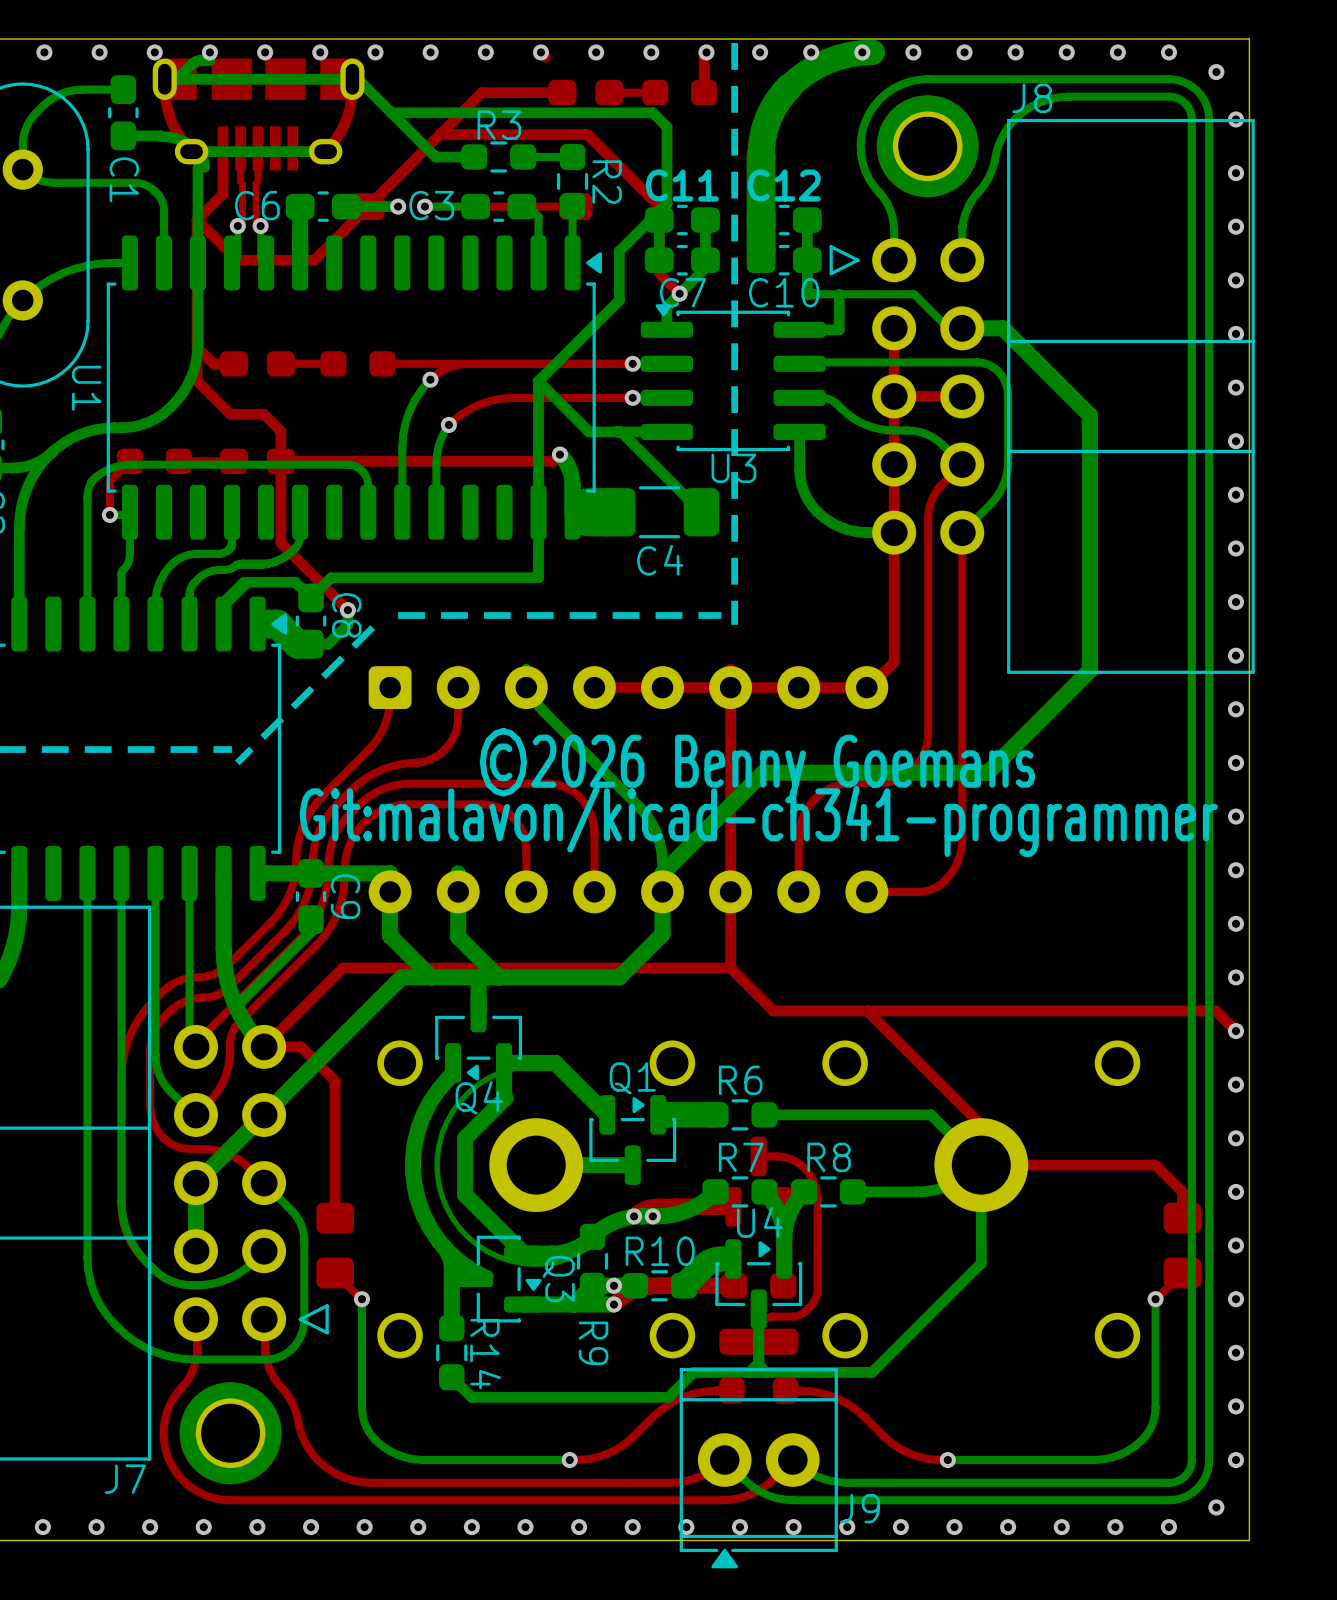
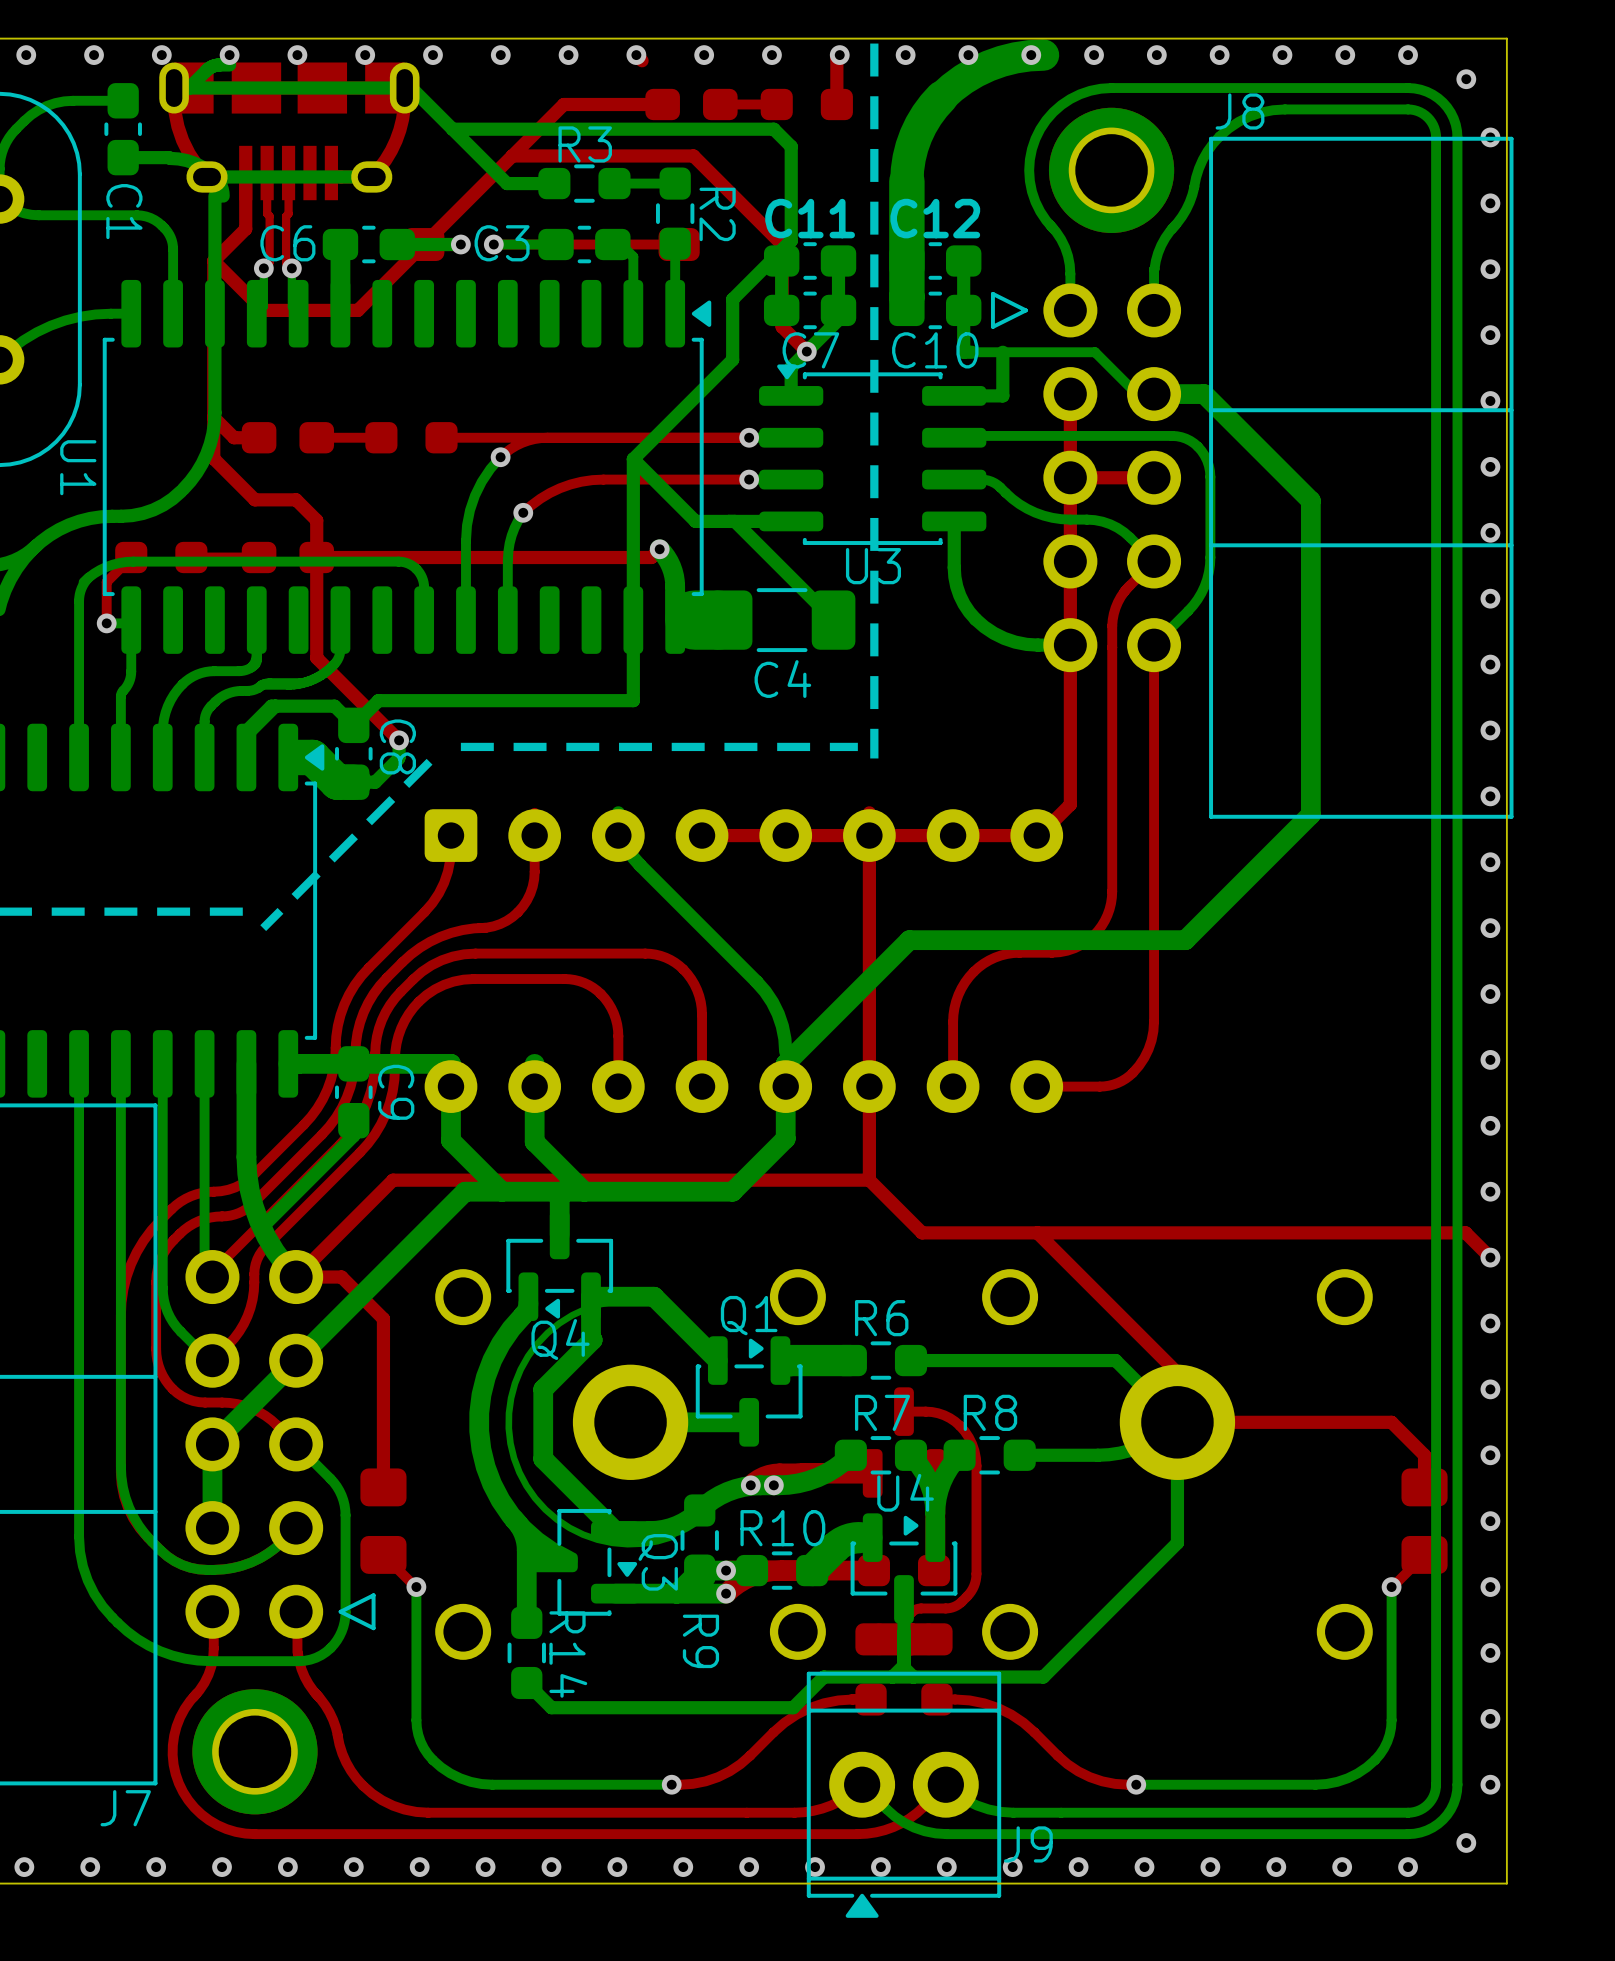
text: ©2026 Benny Goemans (757, 765) -> none
text: Git:malavon/kicad-ch341-programmer (758, 821) -> none

